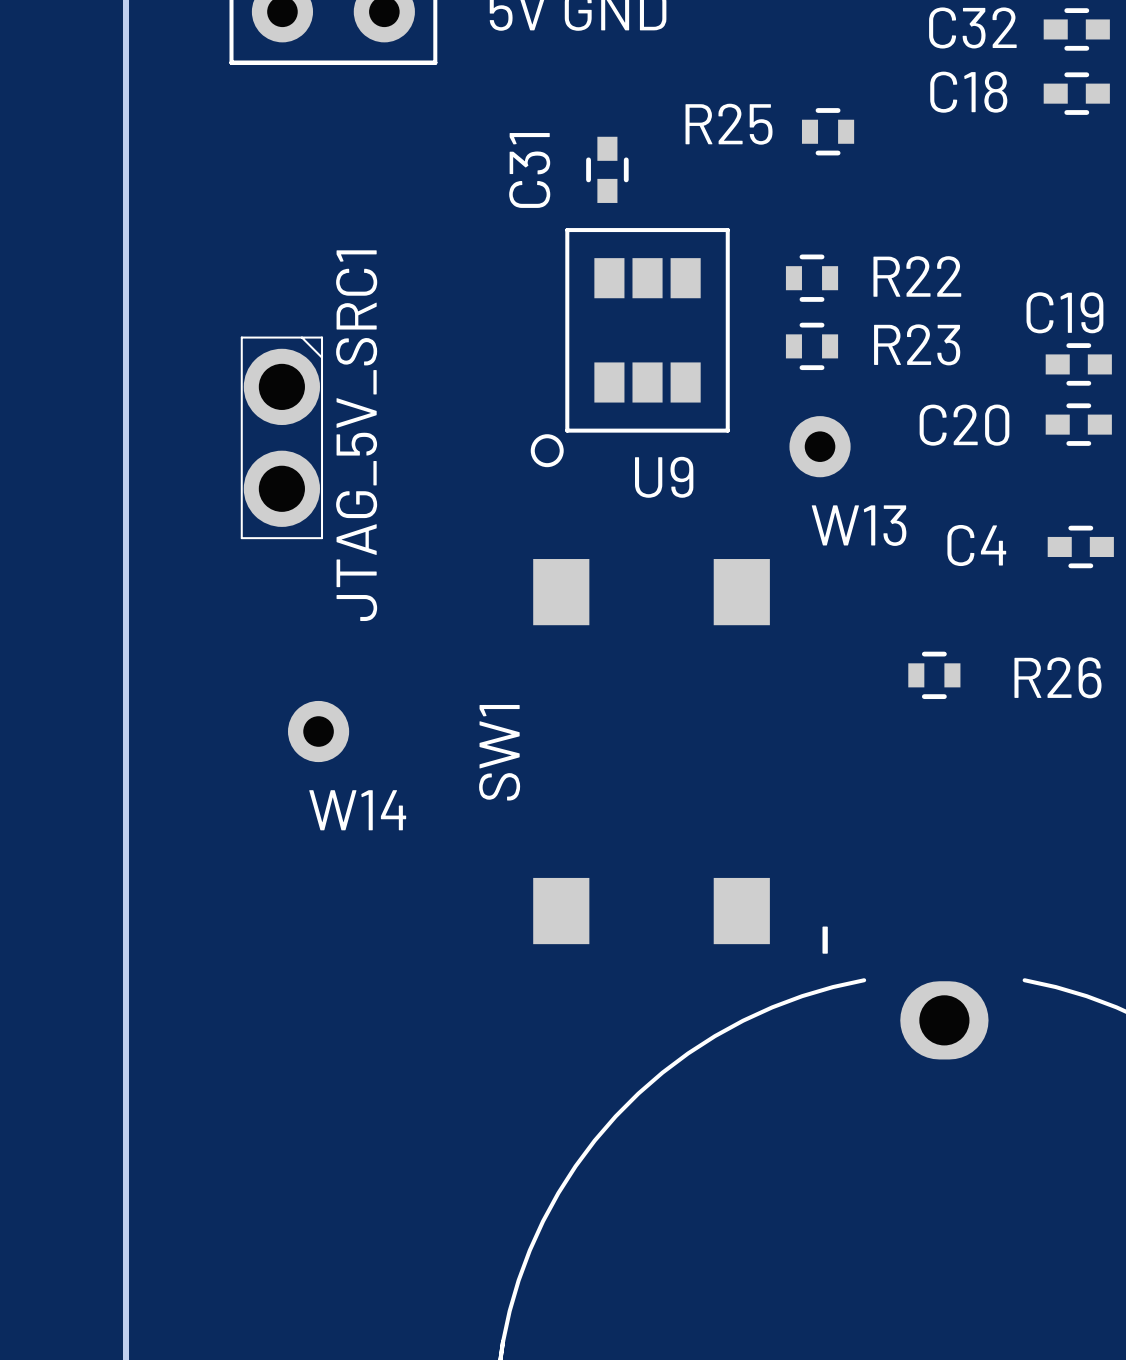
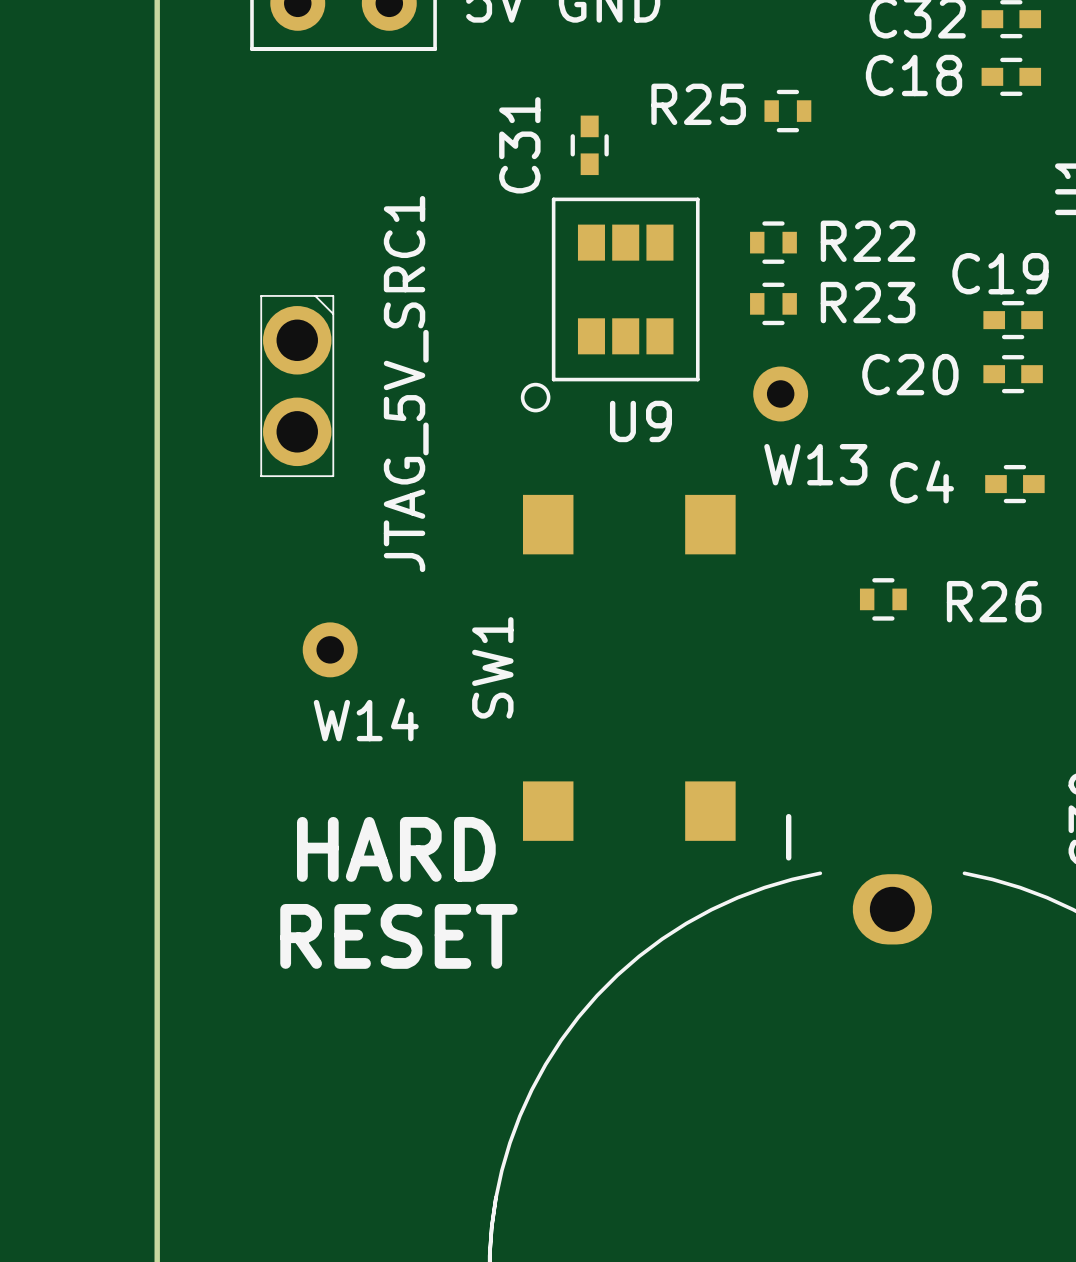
JTAG_5V_SRC1 name position: JTAG_5V_SRC1 (356, 435) -> JTAG_5V_SRC1 (406, 384)
text: none -> HARD (396, 849)
text: none -> RESET (398, 936)

